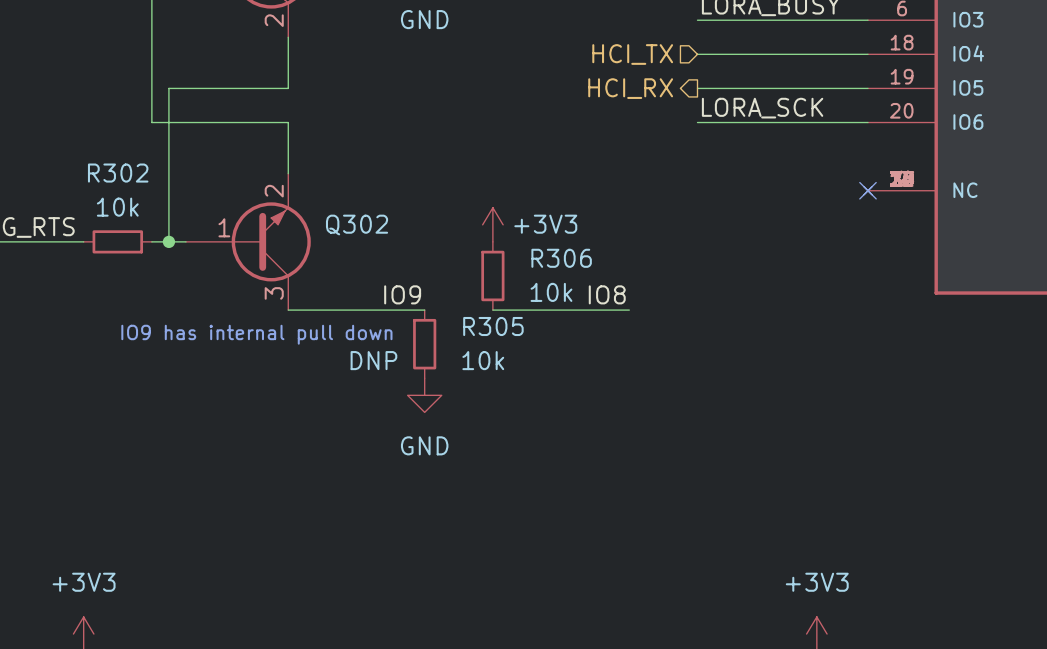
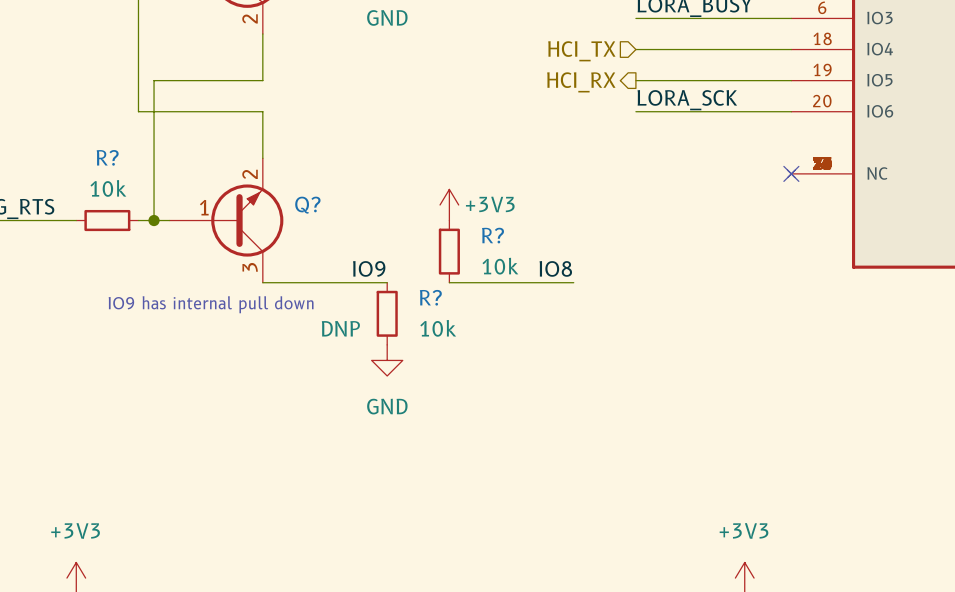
R302 name: R302 (118, 173) -> R? (107, 157)
Q302 name: Q302 (357, 225) -> Q? (307, 205)
R306 name: R306 (561, 258) -> R? (493, 235)
R305 name: R305 (493, 326) -> R? (430, 297)

